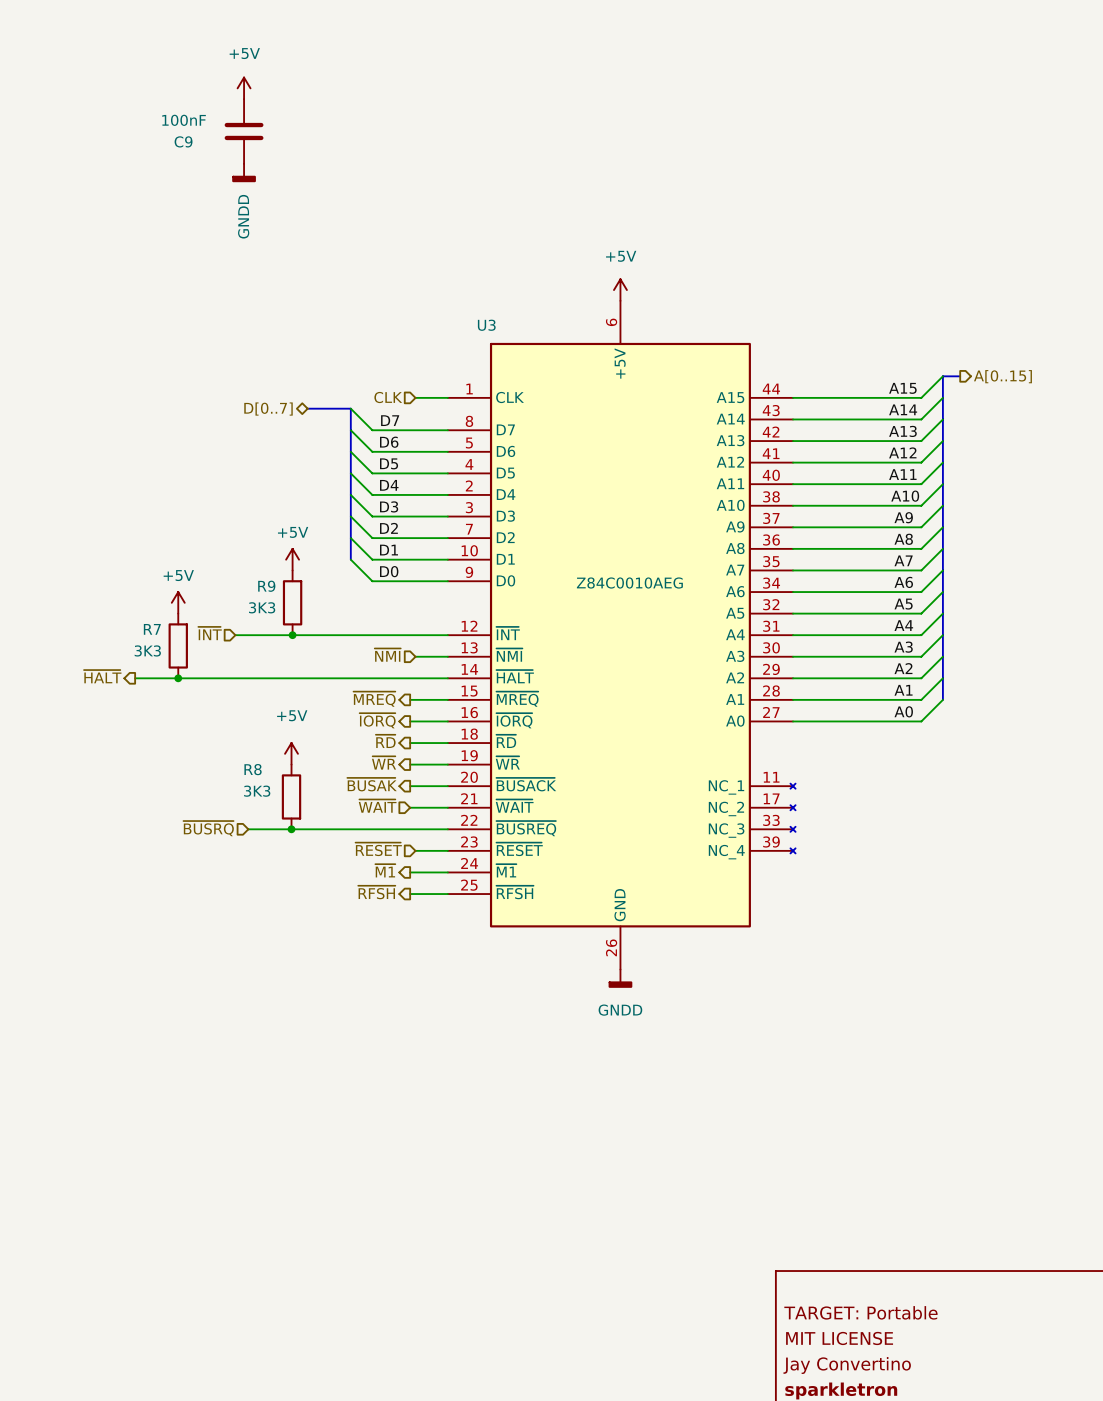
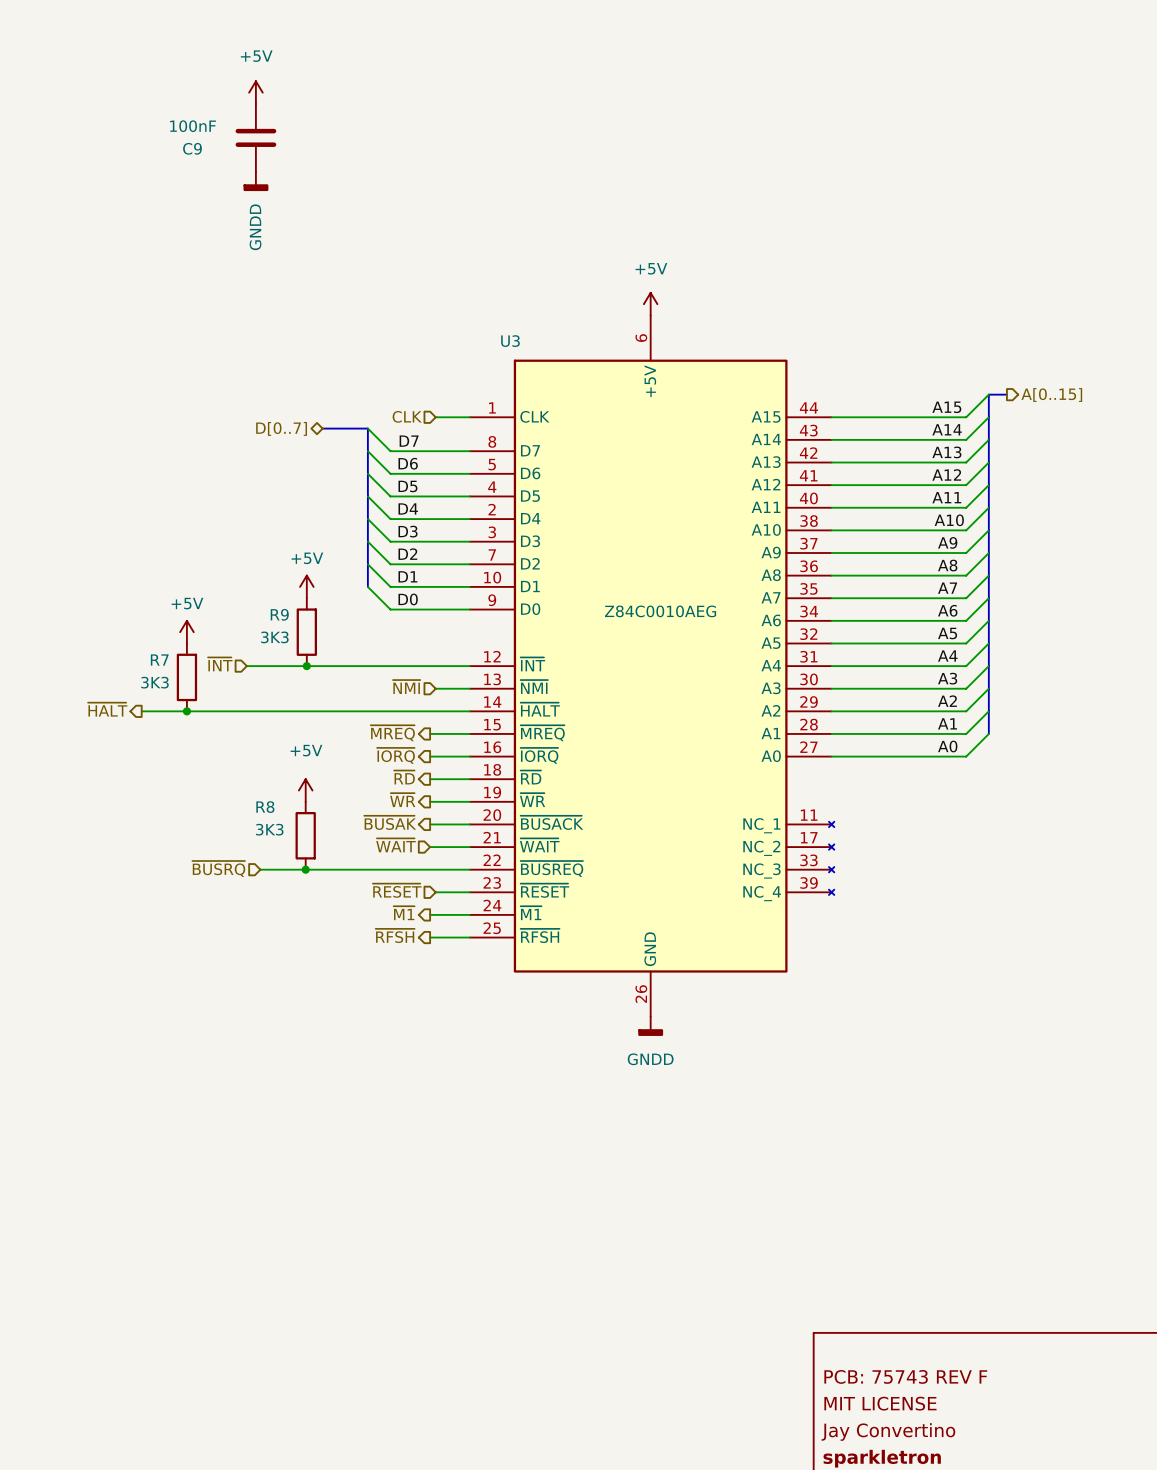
title block: TARGET: Portable (860, 1312) -> PCB: 75743 REV F (905, 1376)

